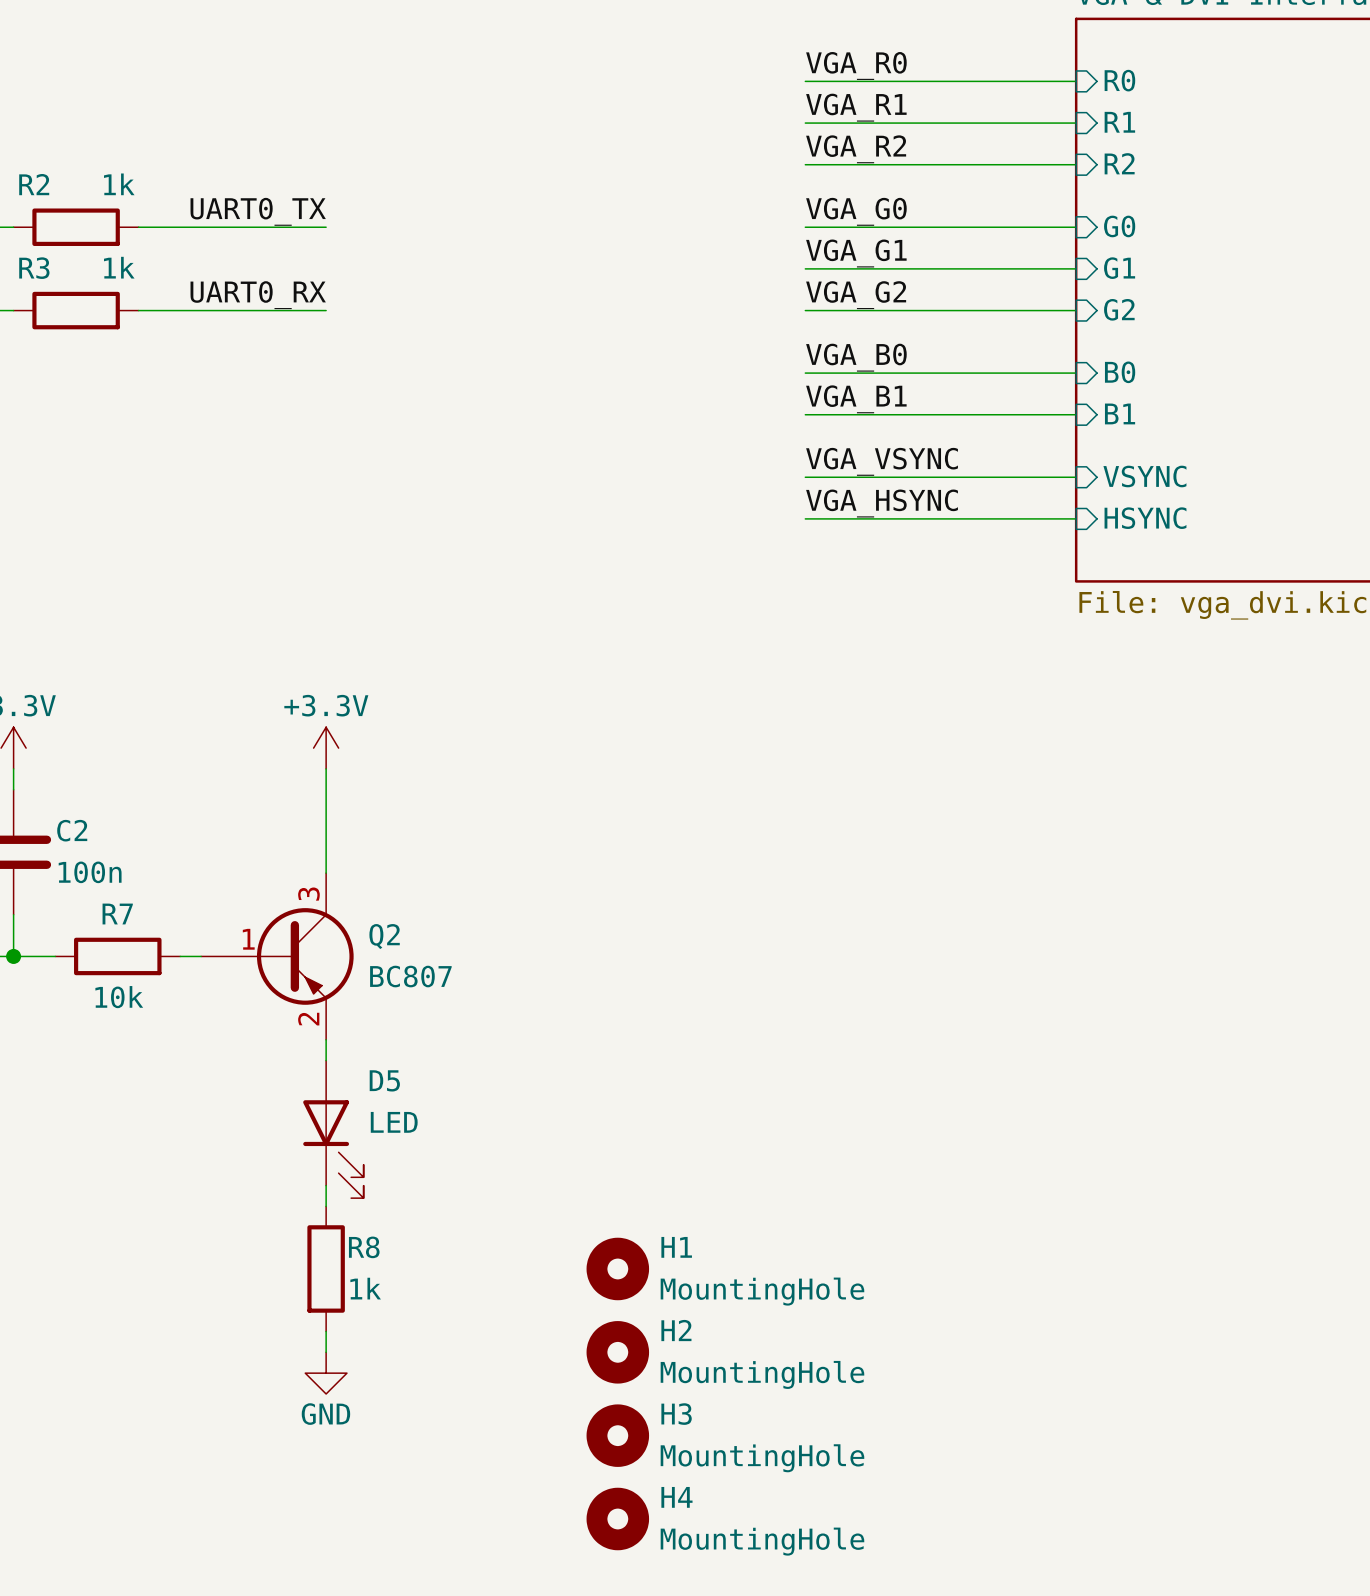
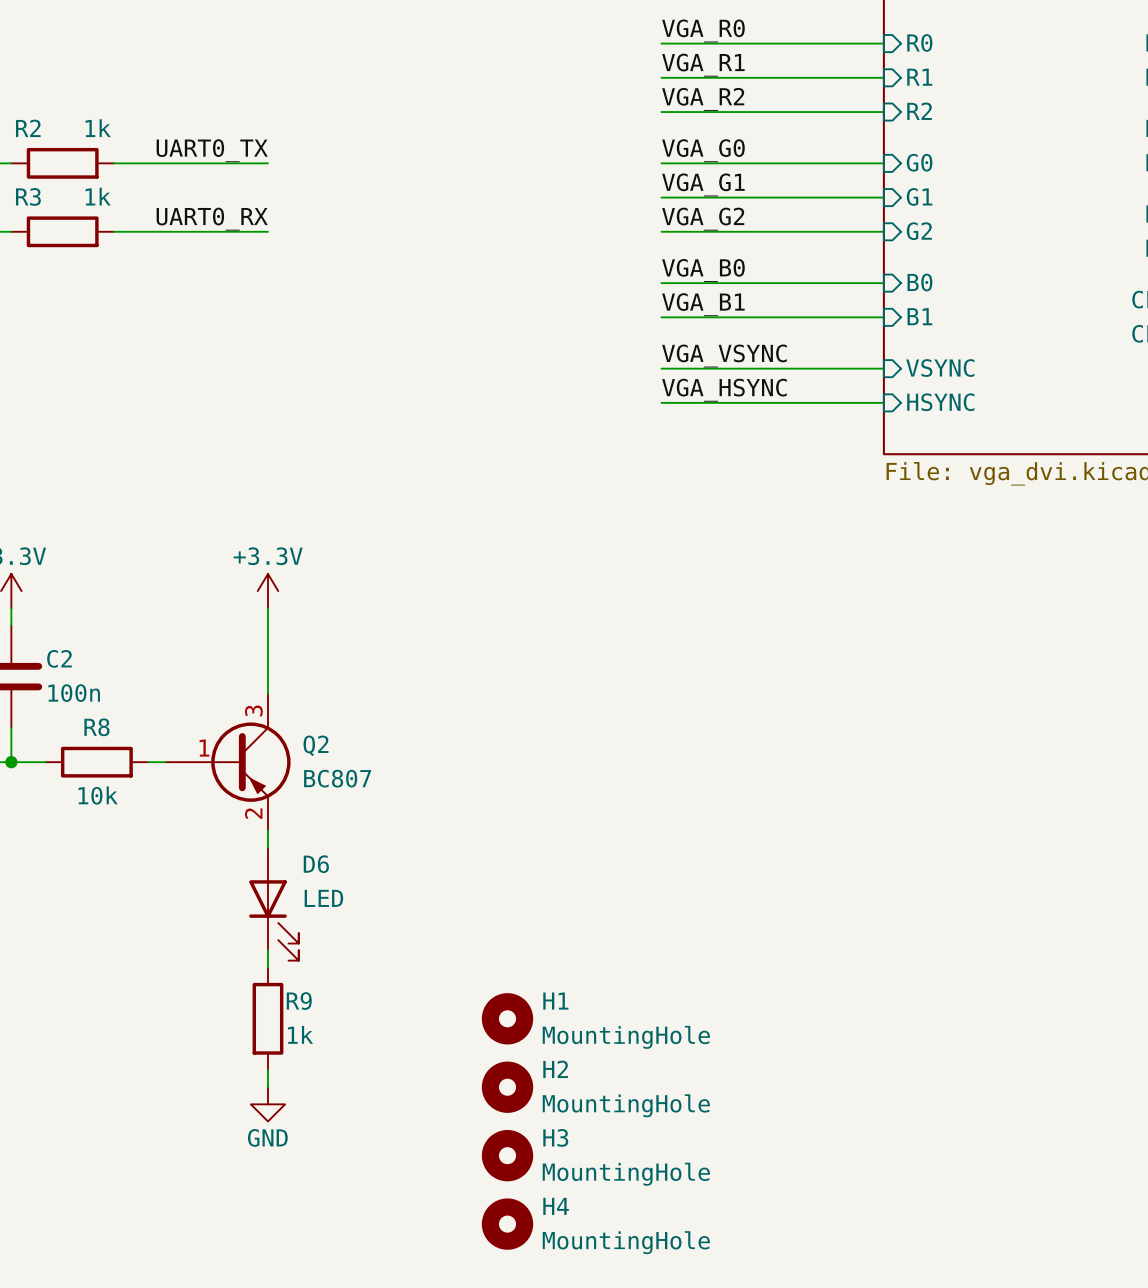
R7 name: R7 (117, 914) -> R8 (96, 727)
D5 name: D5 (384, 1080) -> D6 (316, 864)
R8 name: R8 (364, 1247) -> R9 (299, 1001)

